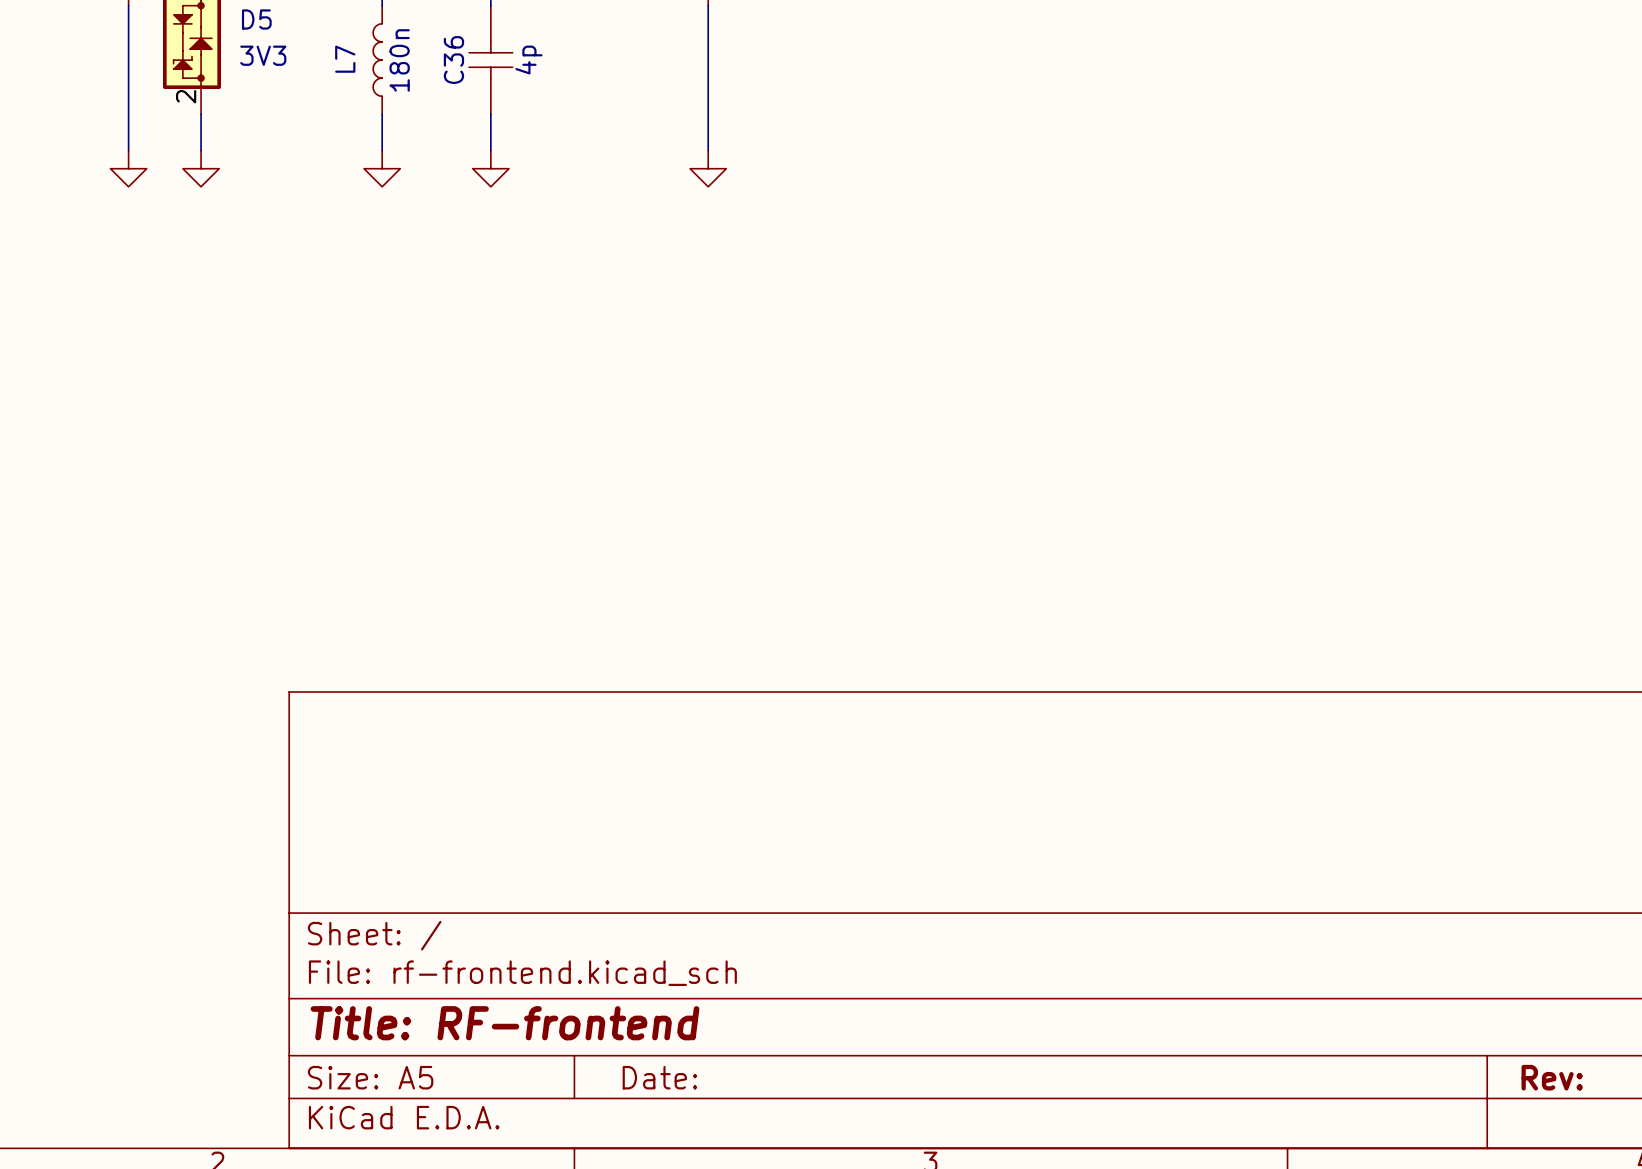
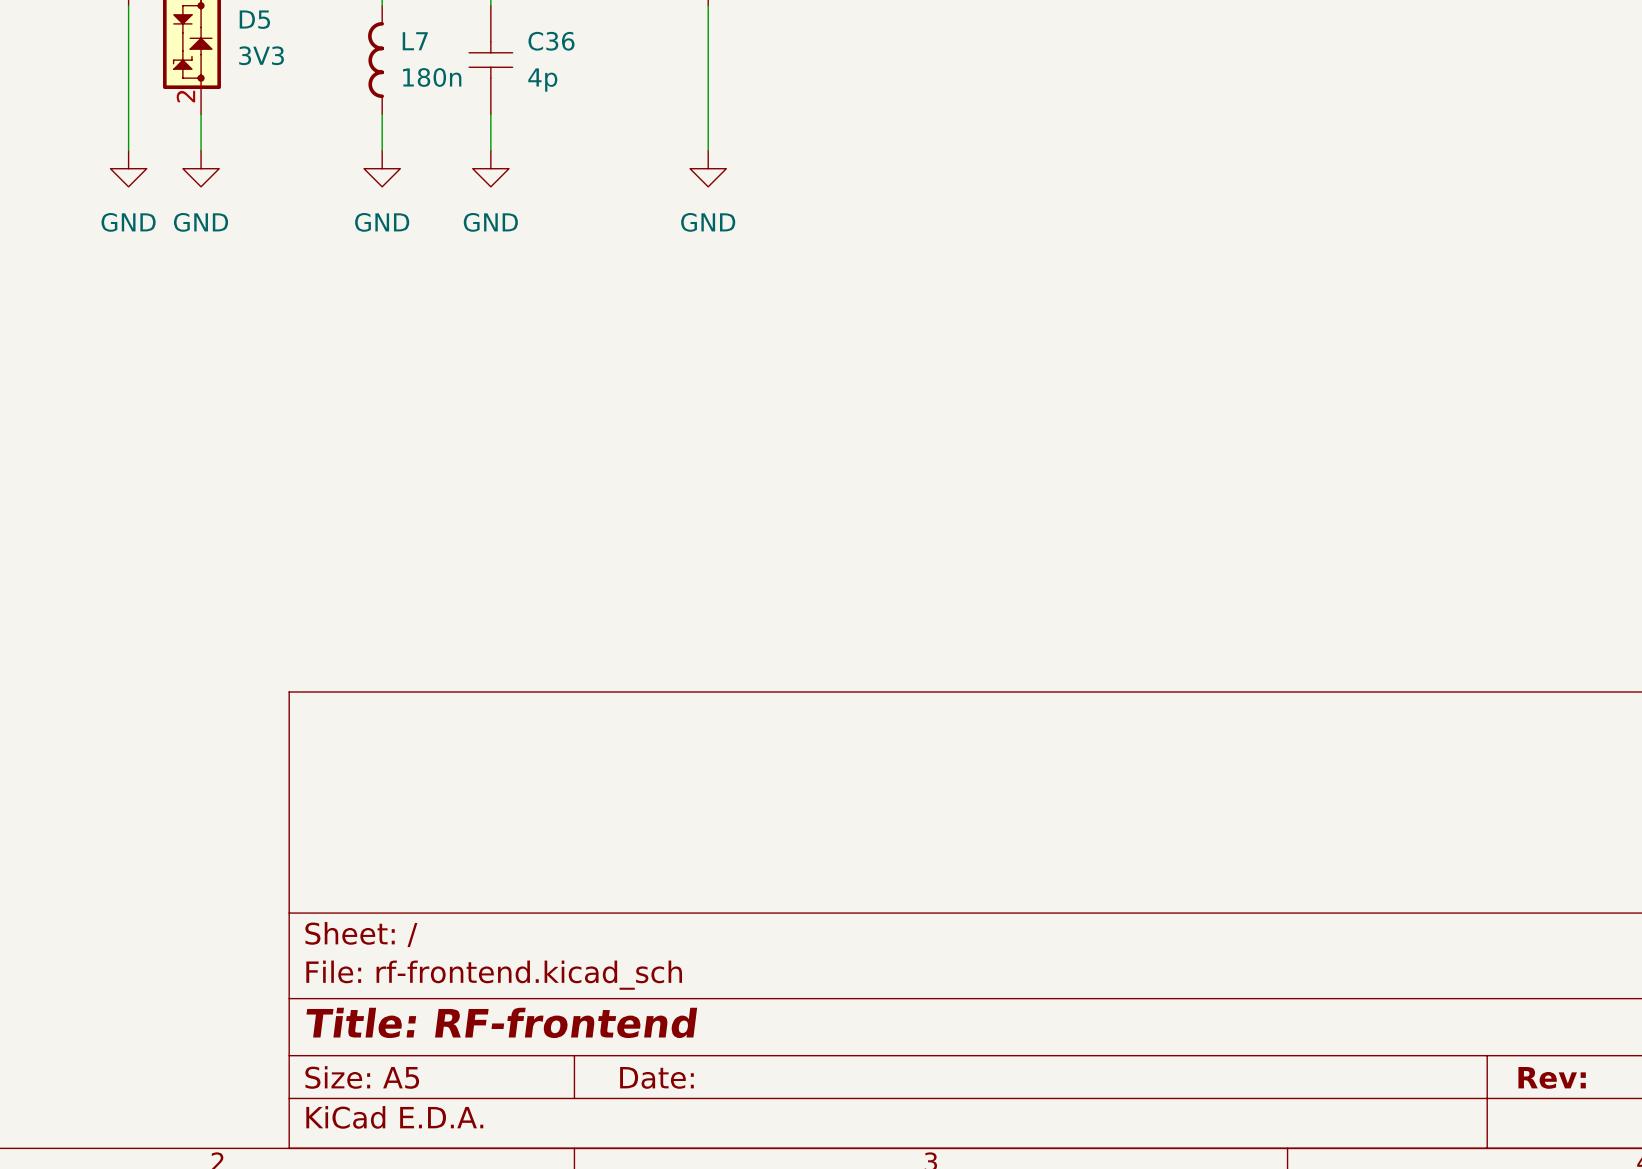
L7 symbol: [373, 5, 383, 115] -> [368, 5, 384, 115]
L7 name rotation: 0° (345, 59) -> 90° clockwise (415, 41)
L7 name position: L7 (345, 59) -> L7 (415, 41)
L7 value rotation: 0° (399, 60) -> 90° clockwise (432, 77)
C36 name rotation: 0° (453, 60) -> 90° clockwise (551, 41)
C36 name position: C36 (453, 60) -> C36 (551, 41)
C36 value rotation: 0° (528, 60) -> 90° clockwise (542, 80)
power symbol text: none -> GND (128, 222)
power symbol text: none -> GND (201, 222)
power symbol text: none -> GND (382, 222)
power symbol text: none -> GND (490, 222)
power symbol text: none -> GND (708, 222)

